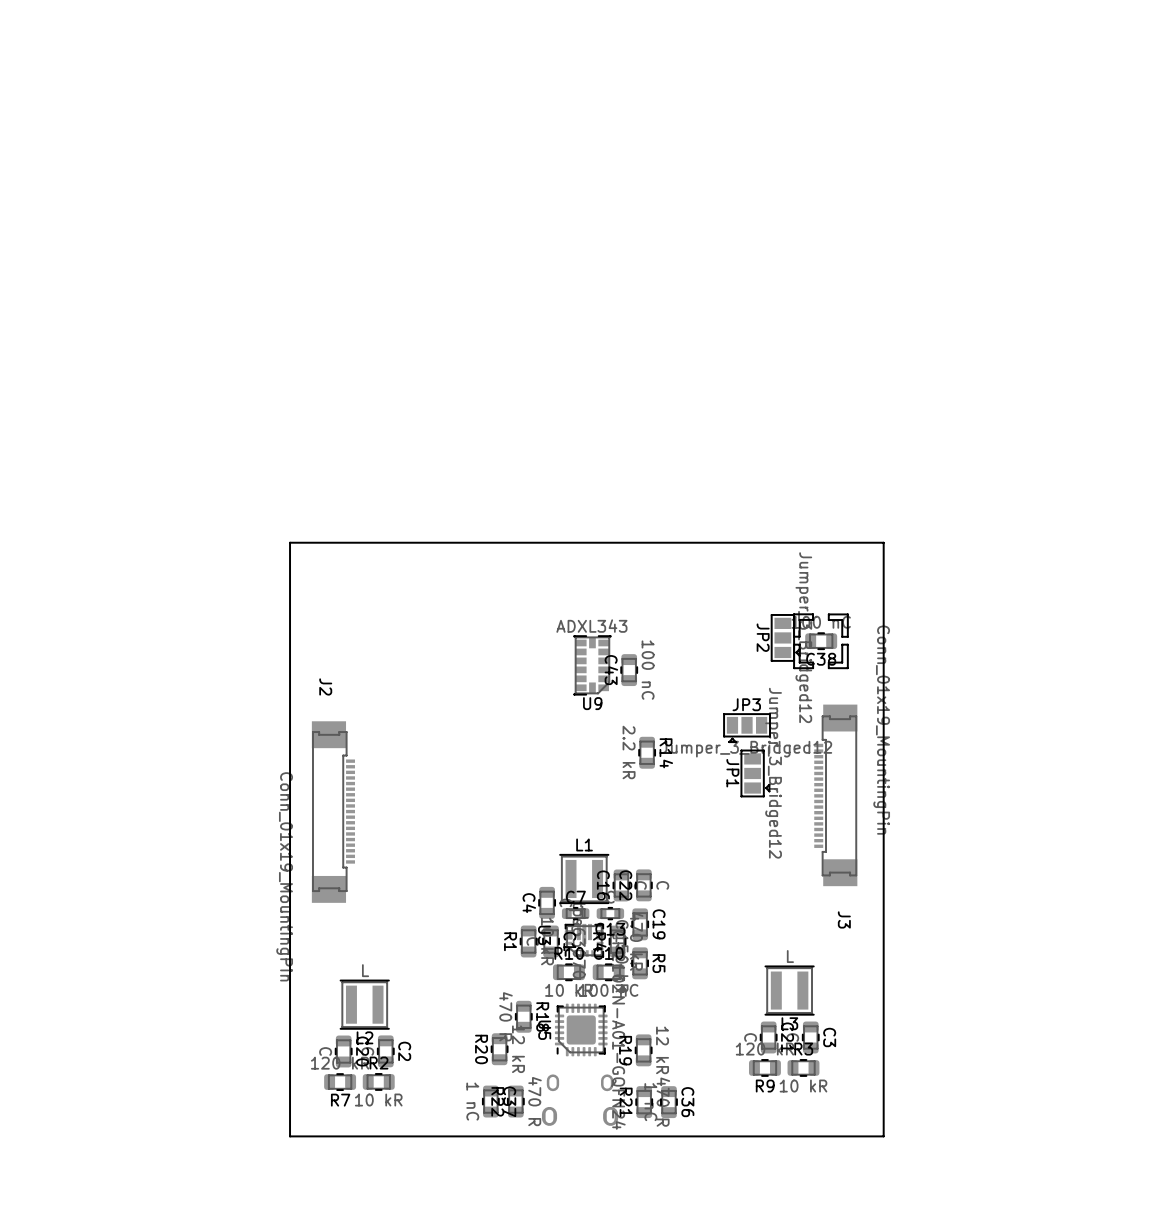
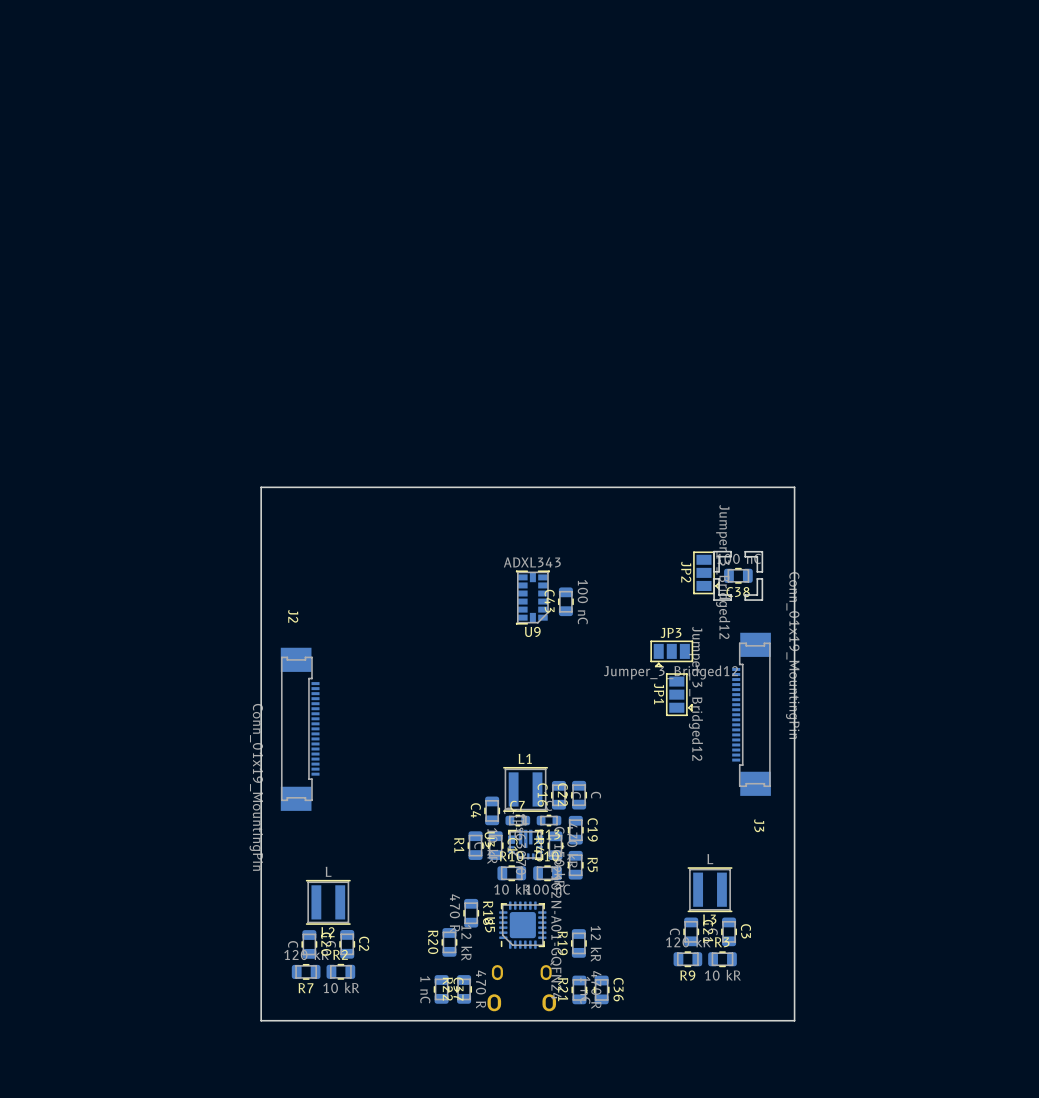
R14: 2.2 kR (647, 752) -> none

